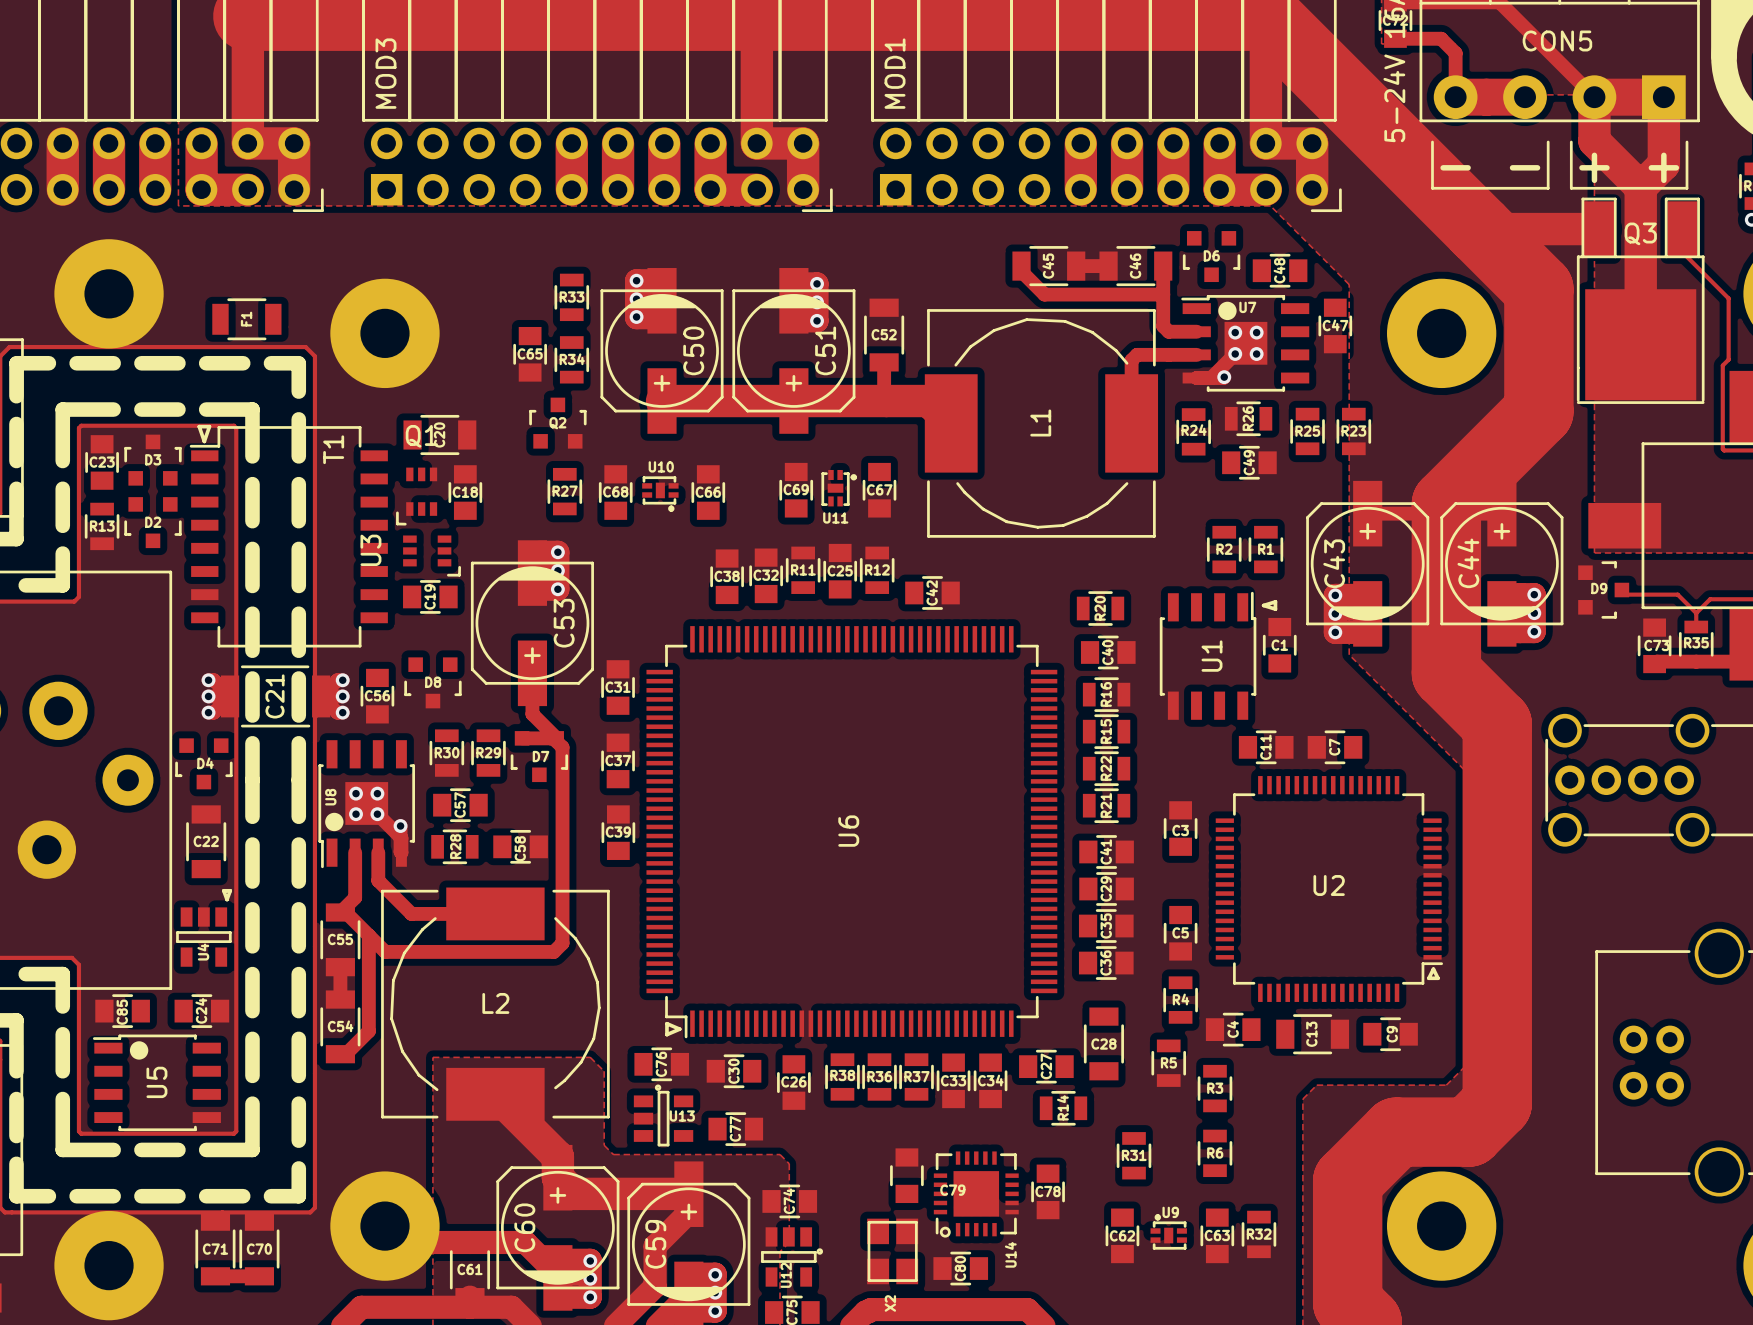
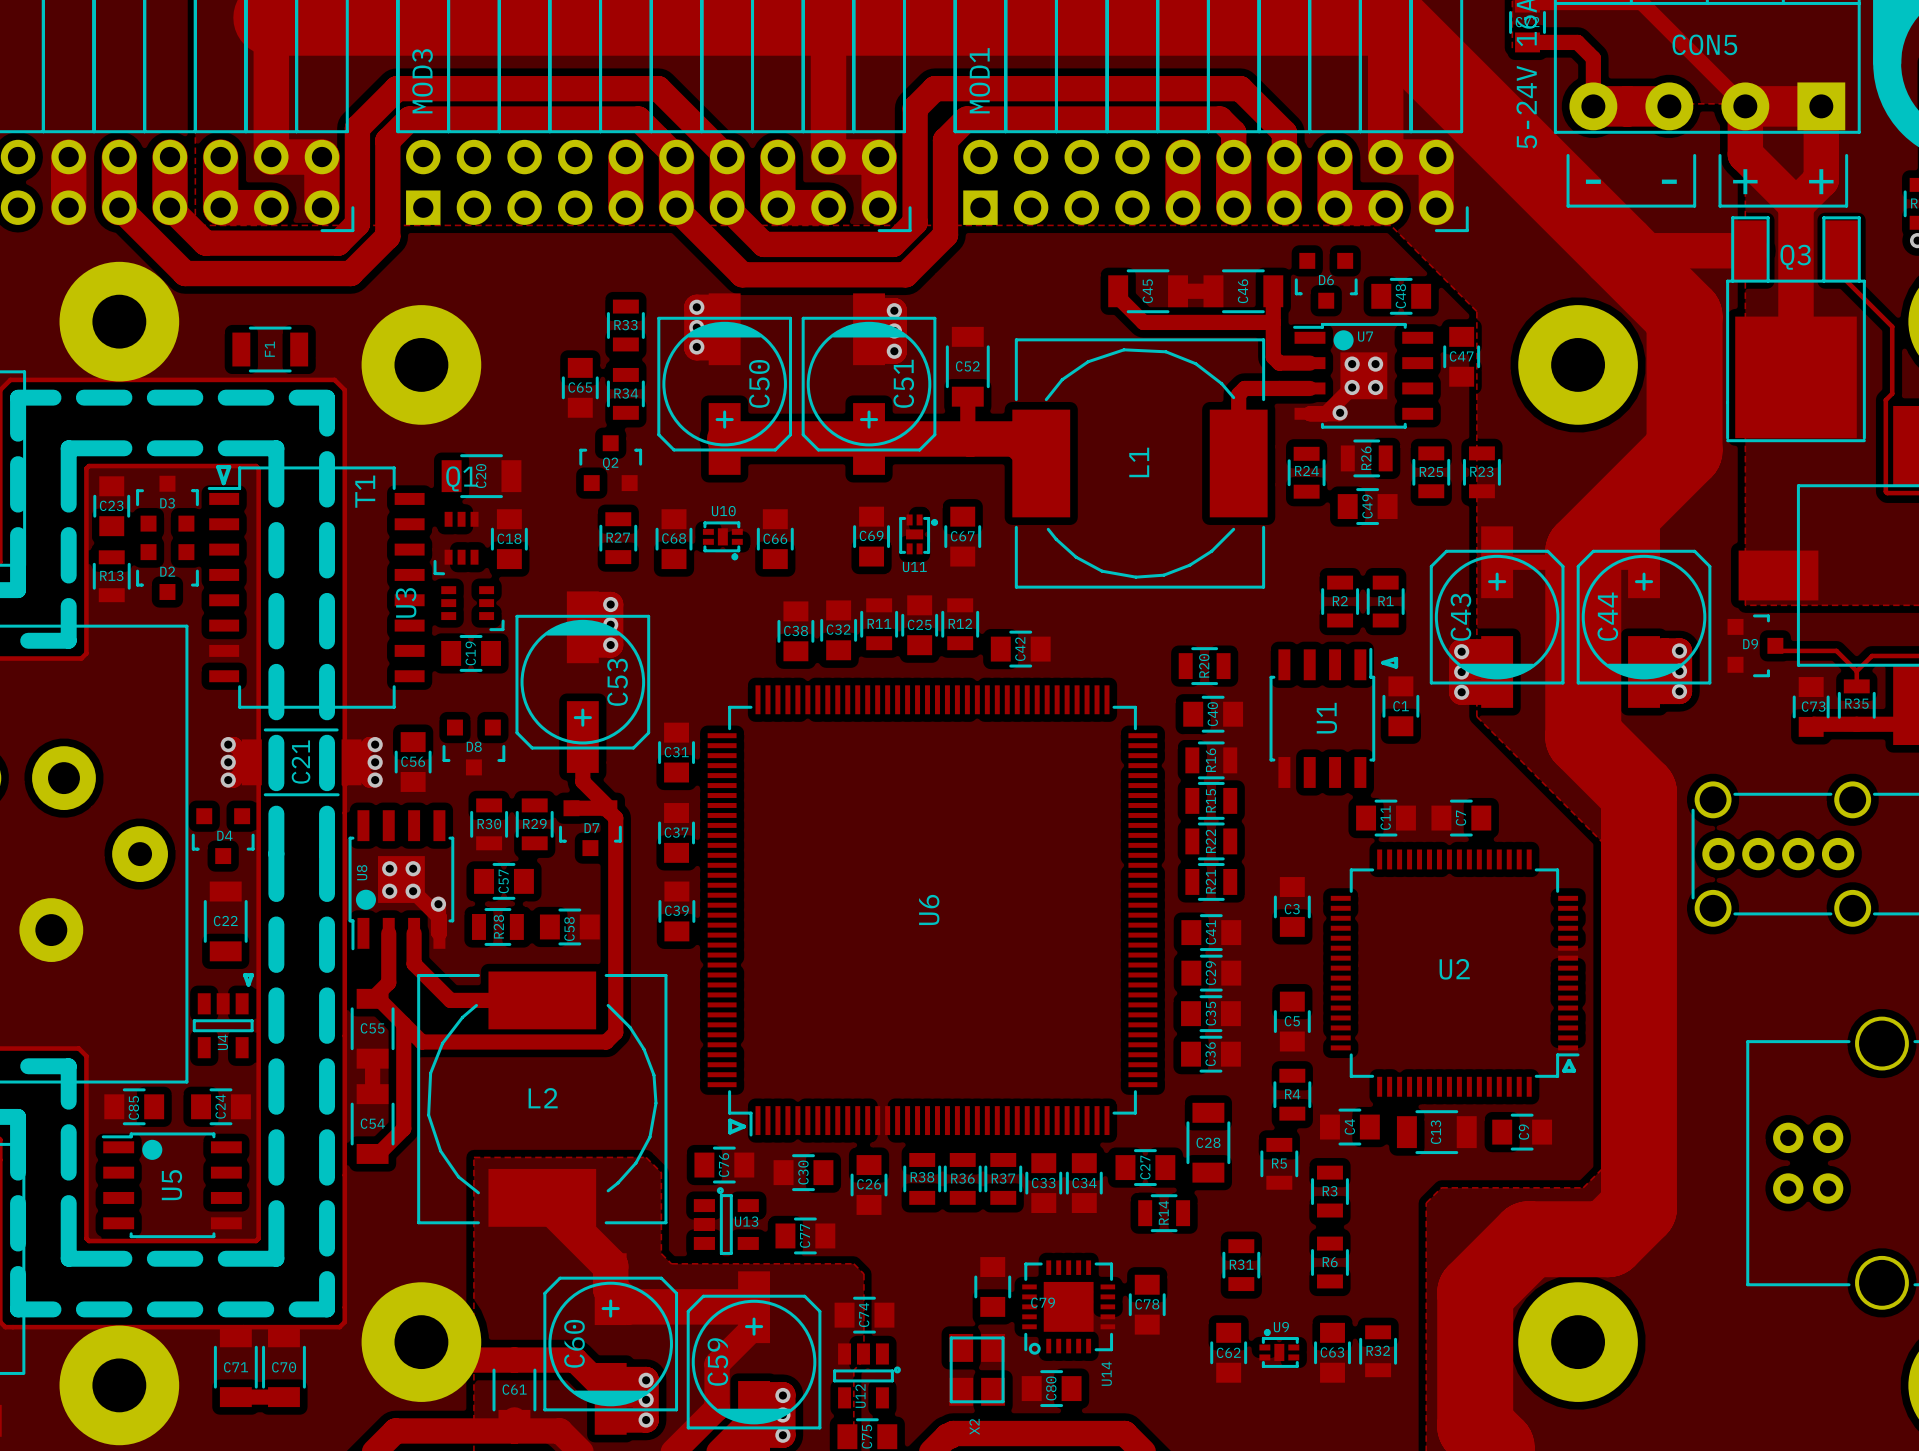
track: none -> (676, 157) (638, 119) (409, 119) (387, 140) (387, 236) (350, 273) (185, 273) (119, 207)
track: none -> (727, 157) (658, 88) (396, 88) (357, 128) (357, 223) (338, 243) (205, 243) (170, 207)
track: none -> (1233, 157) (1233, 132) (1220, 119) (966, 119) (945, 140) (945, 235) (905, 274) (742, 274) (676, 207)
track: none -> (1284, 157) (1284, 132) (1240, 88) (934, 88) (915, 108) (915, 222) (893, 244) (763, 244) (727, 207)

